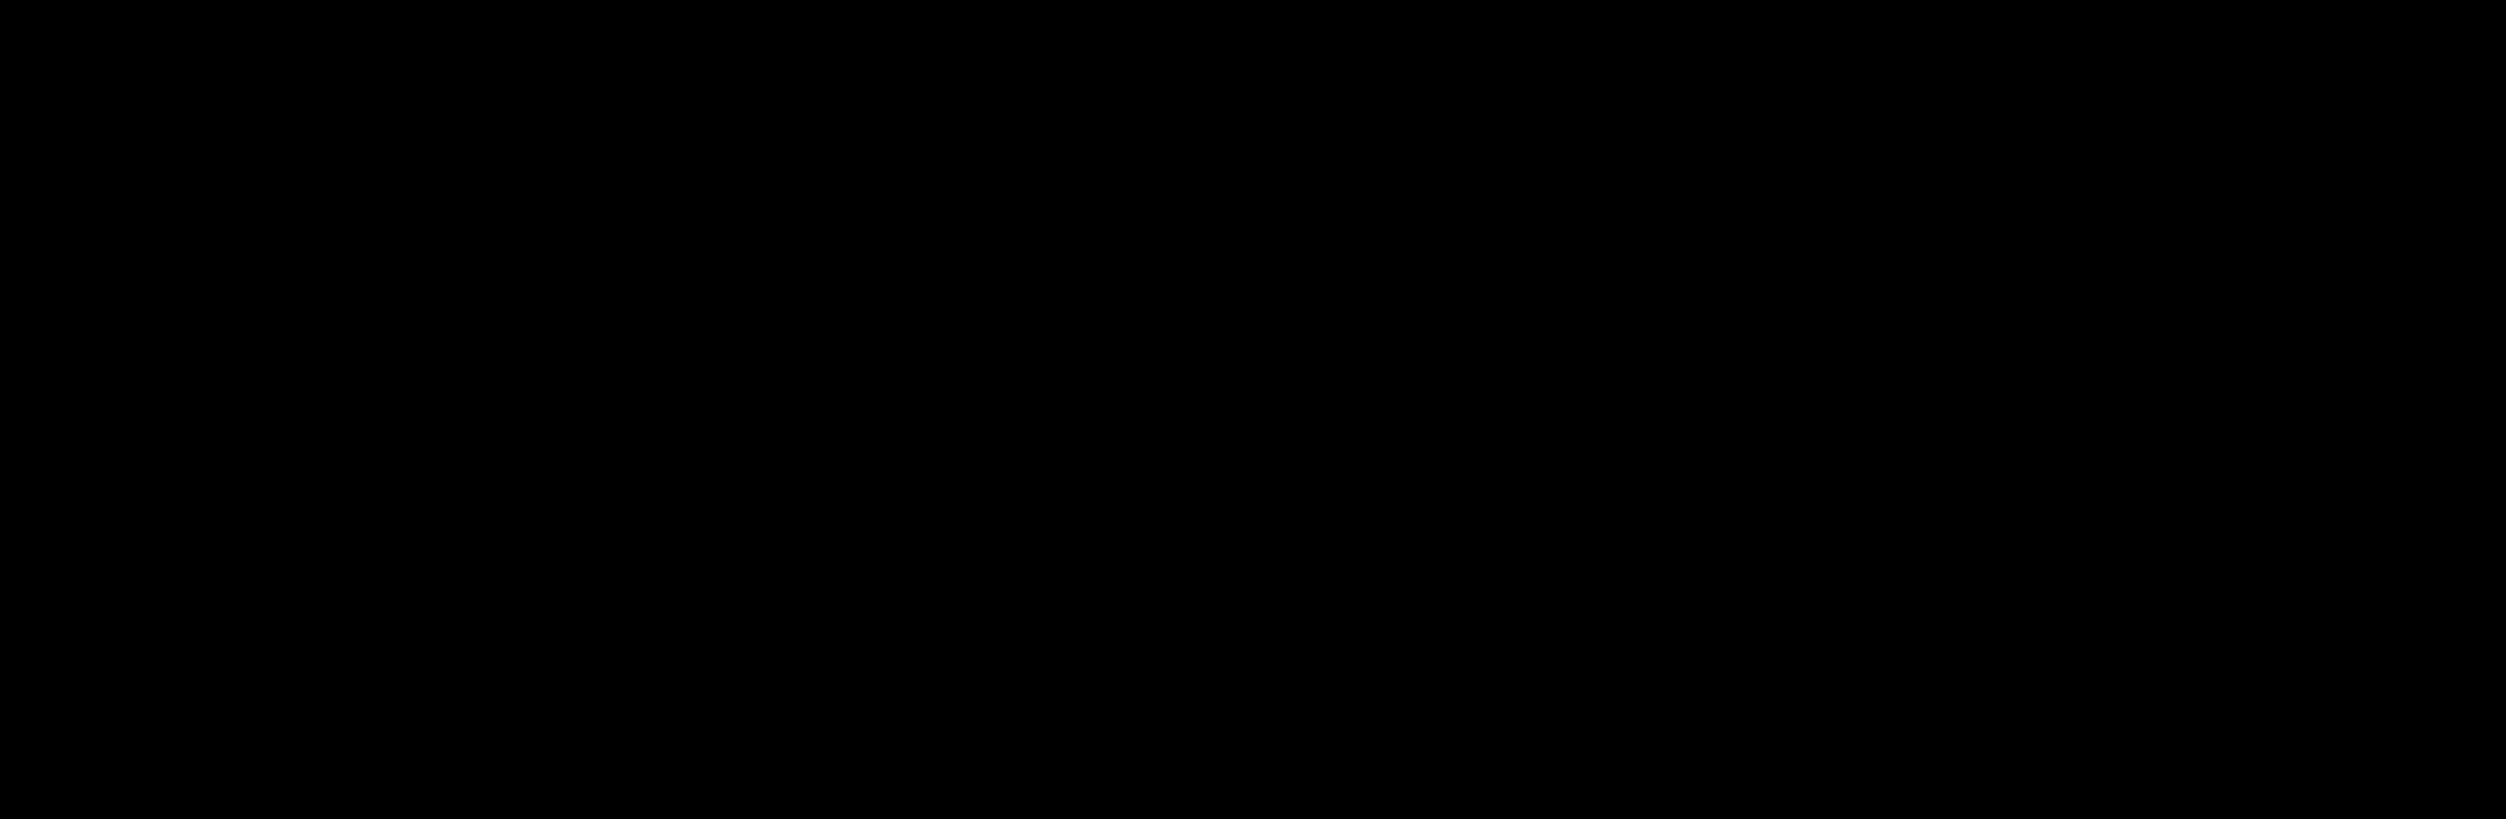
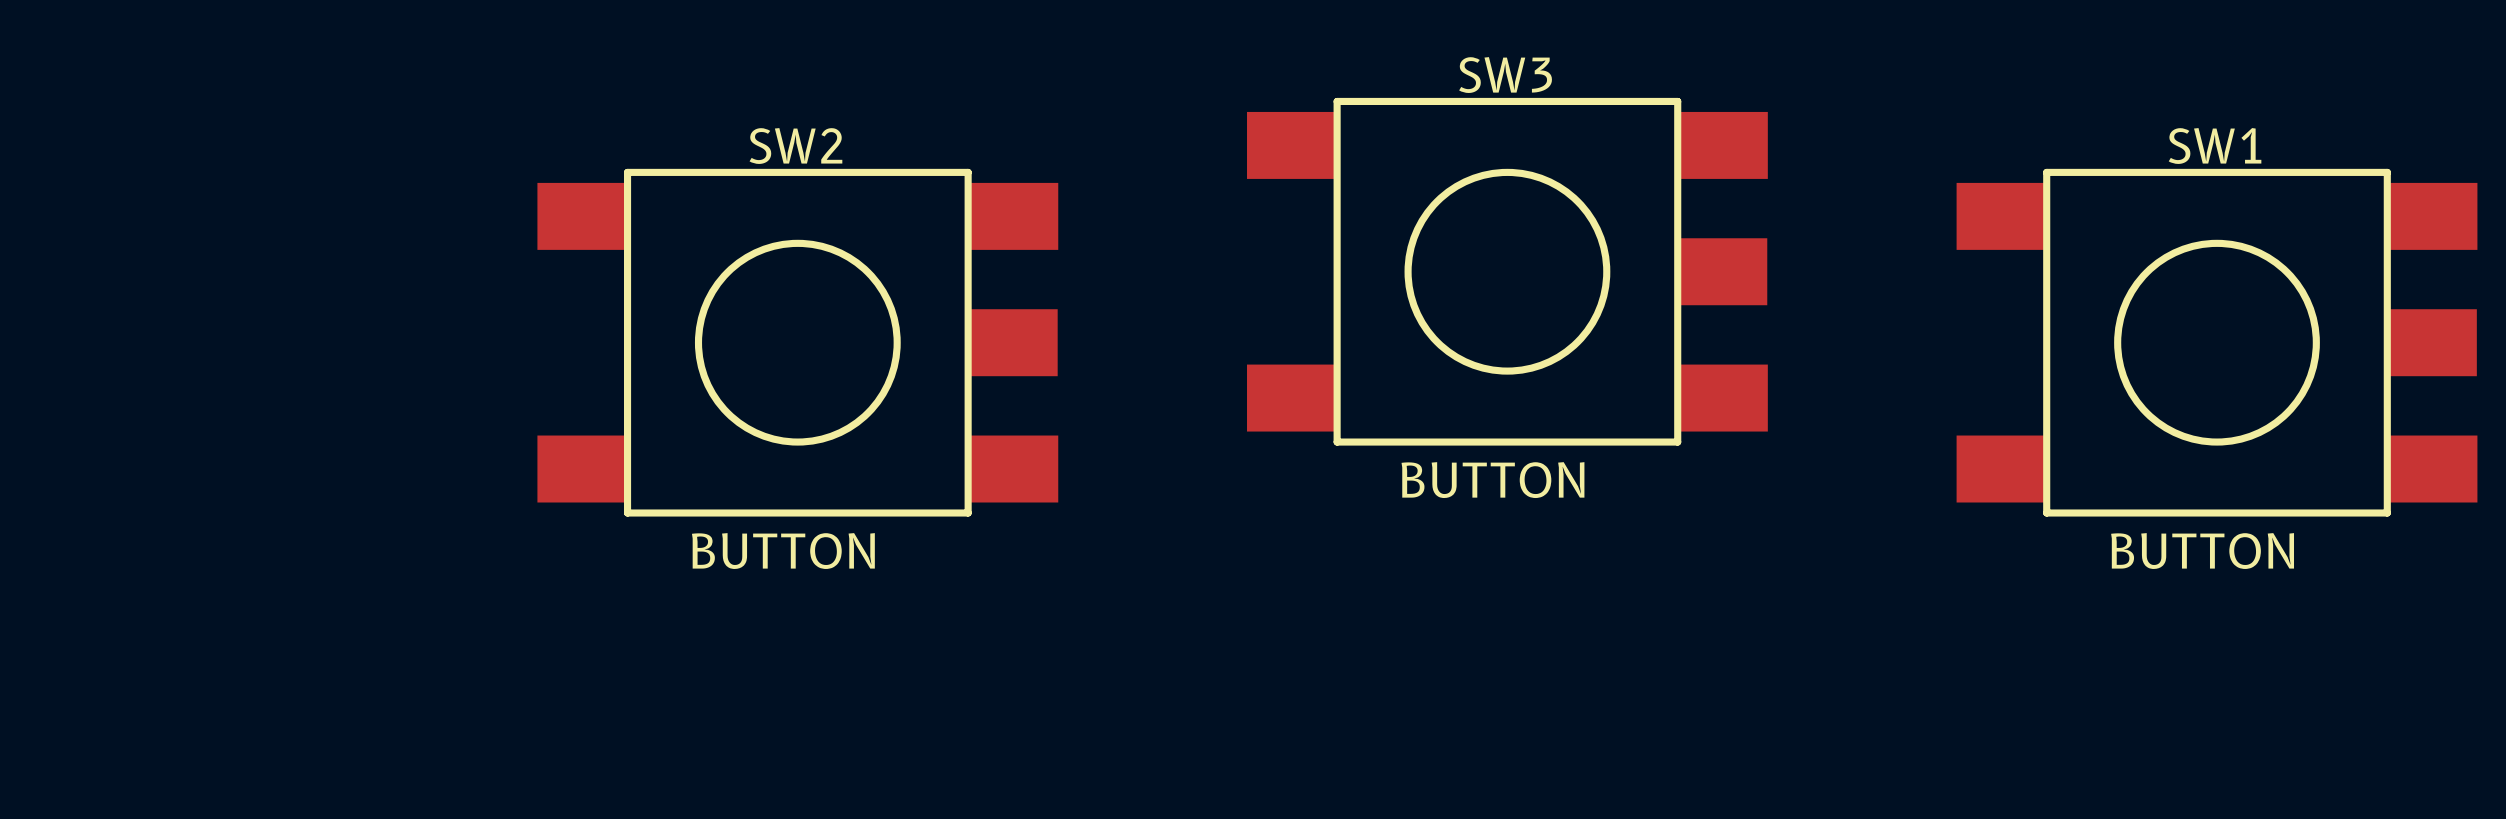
SW3: none -> BUTTON (1507, 271)
SW2: none -> BUTTON (797, 342)
SW1: none -> BUTTON (2217, 342)

